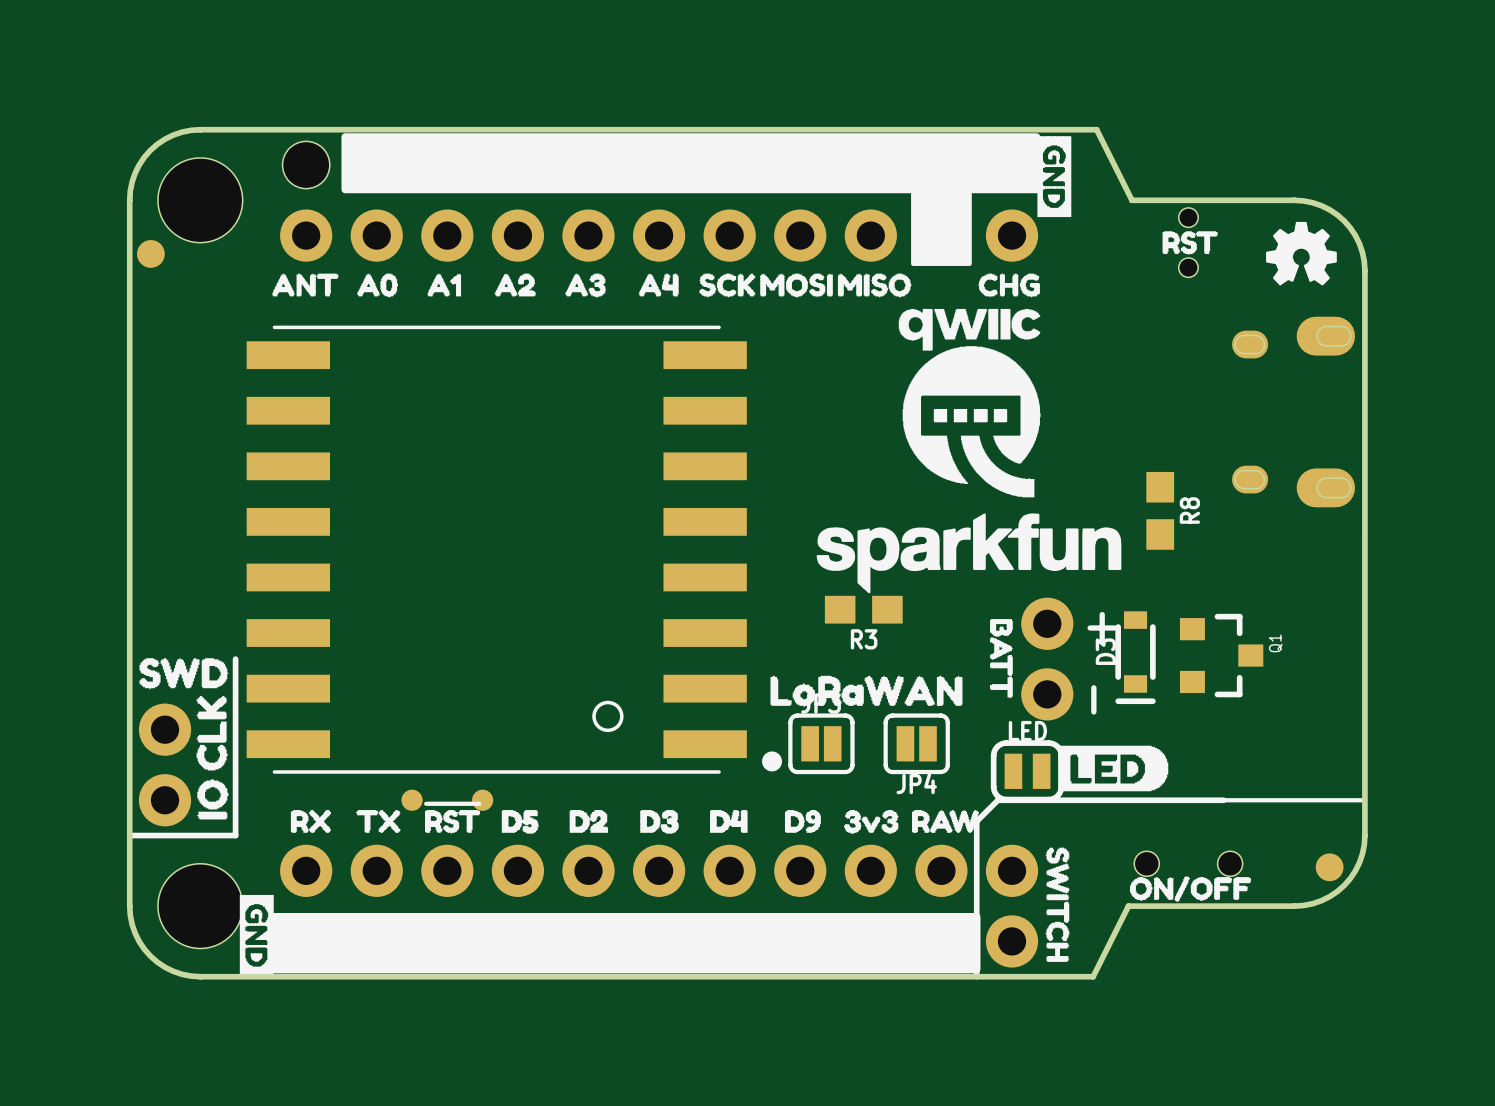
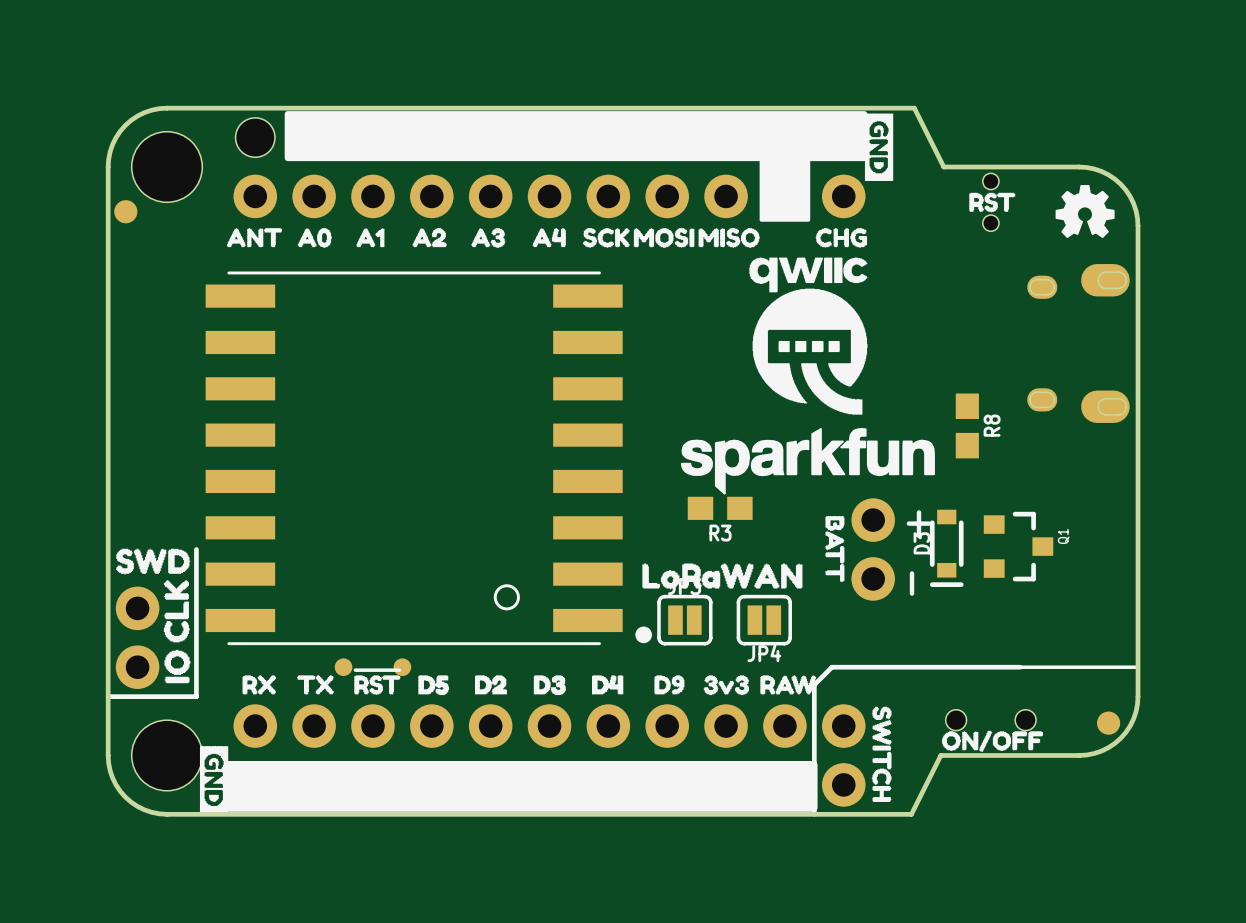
drawing: [1058, 745, 1169, 792] -> none
LED: (1027, 771) -> none

